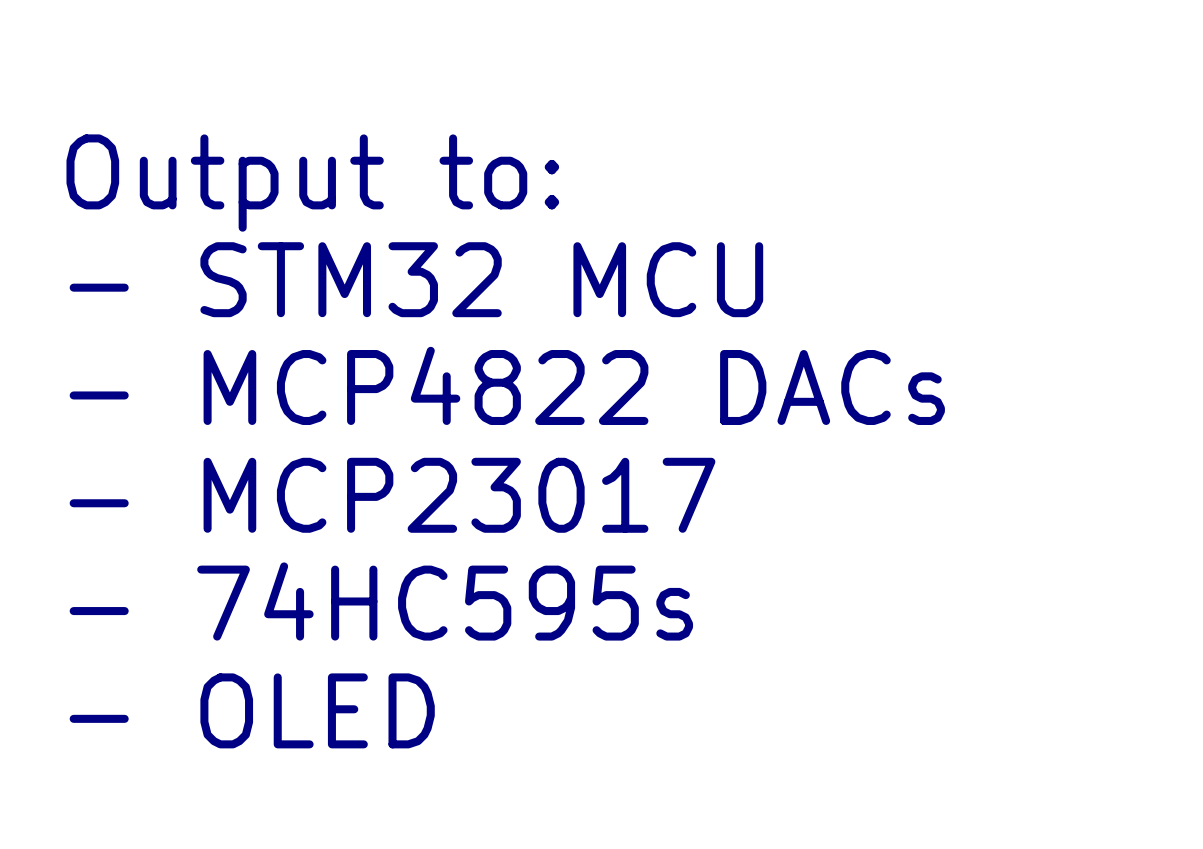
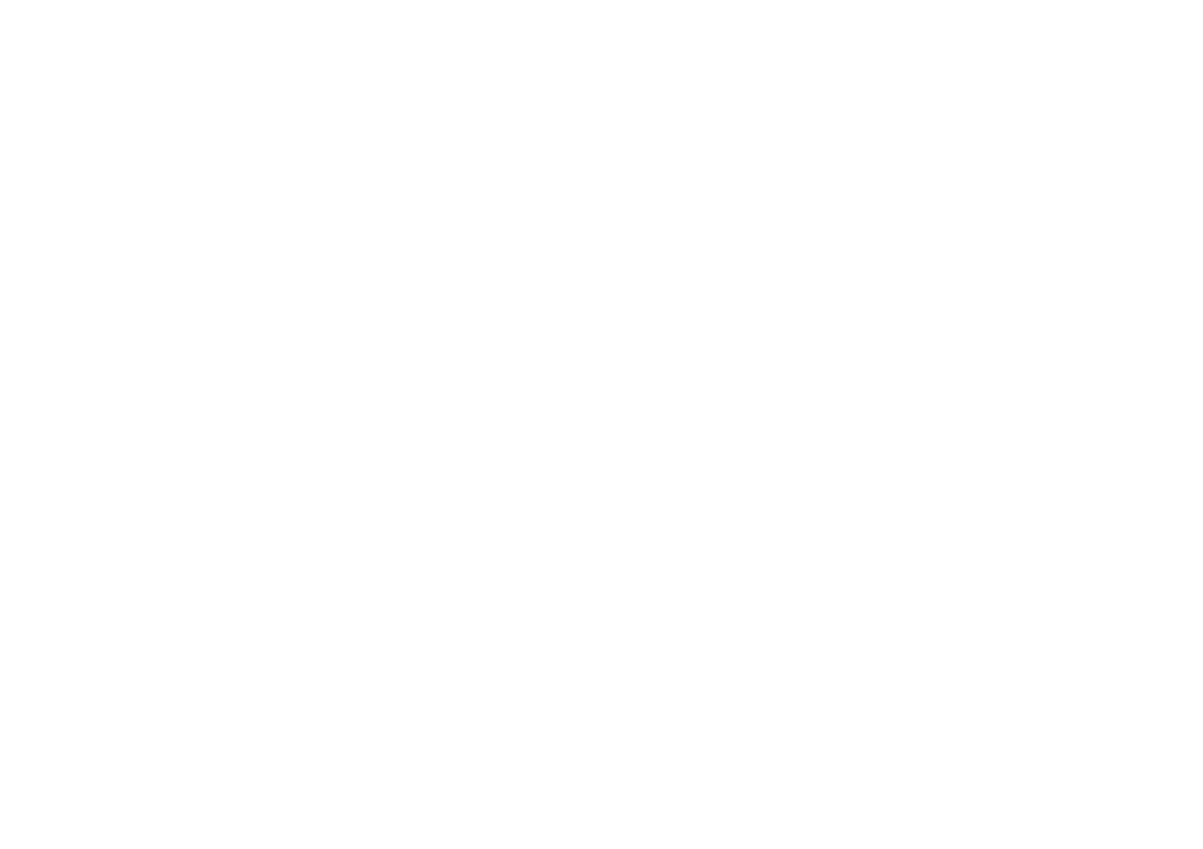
text: Output to: (312, 183) -> none
text: - STM32 MCU (416, 279) -> none
text: - MCP4822 DACs (507, 385) -> none
text: - MCP23017 (392, 495) -> none
text: - 74HC595s (381, 601) -> none
text: - OLED (252, 710) -> none

